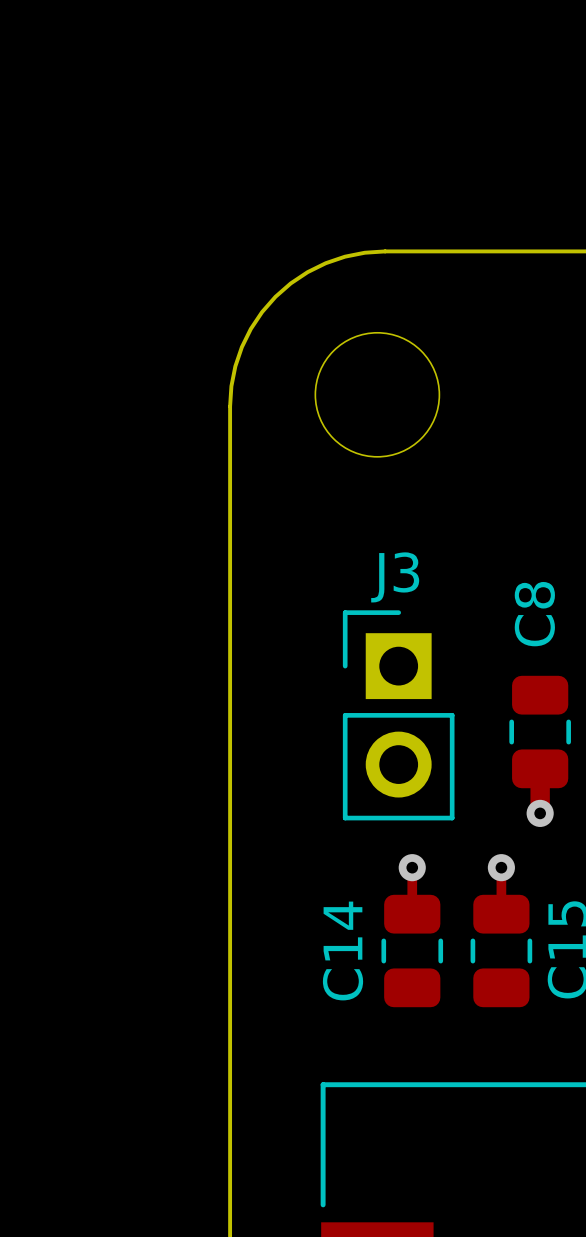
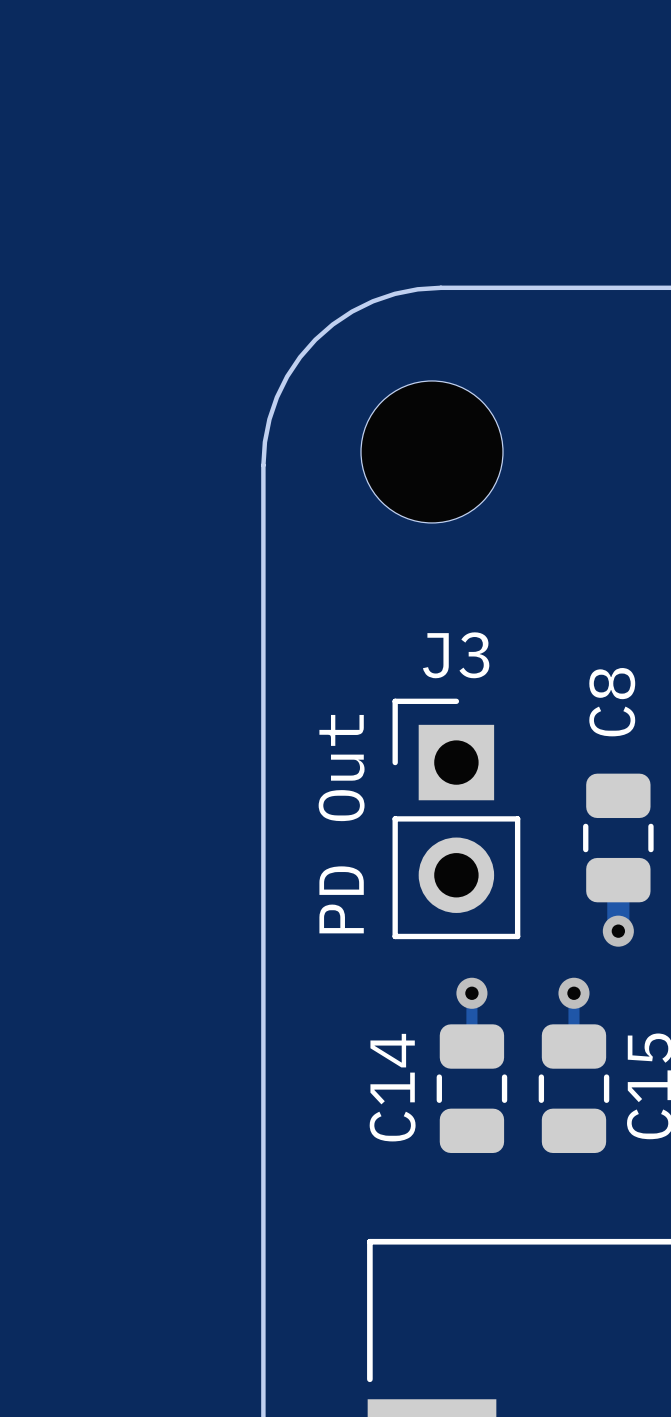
text: none -> PD Out (341, 824)

